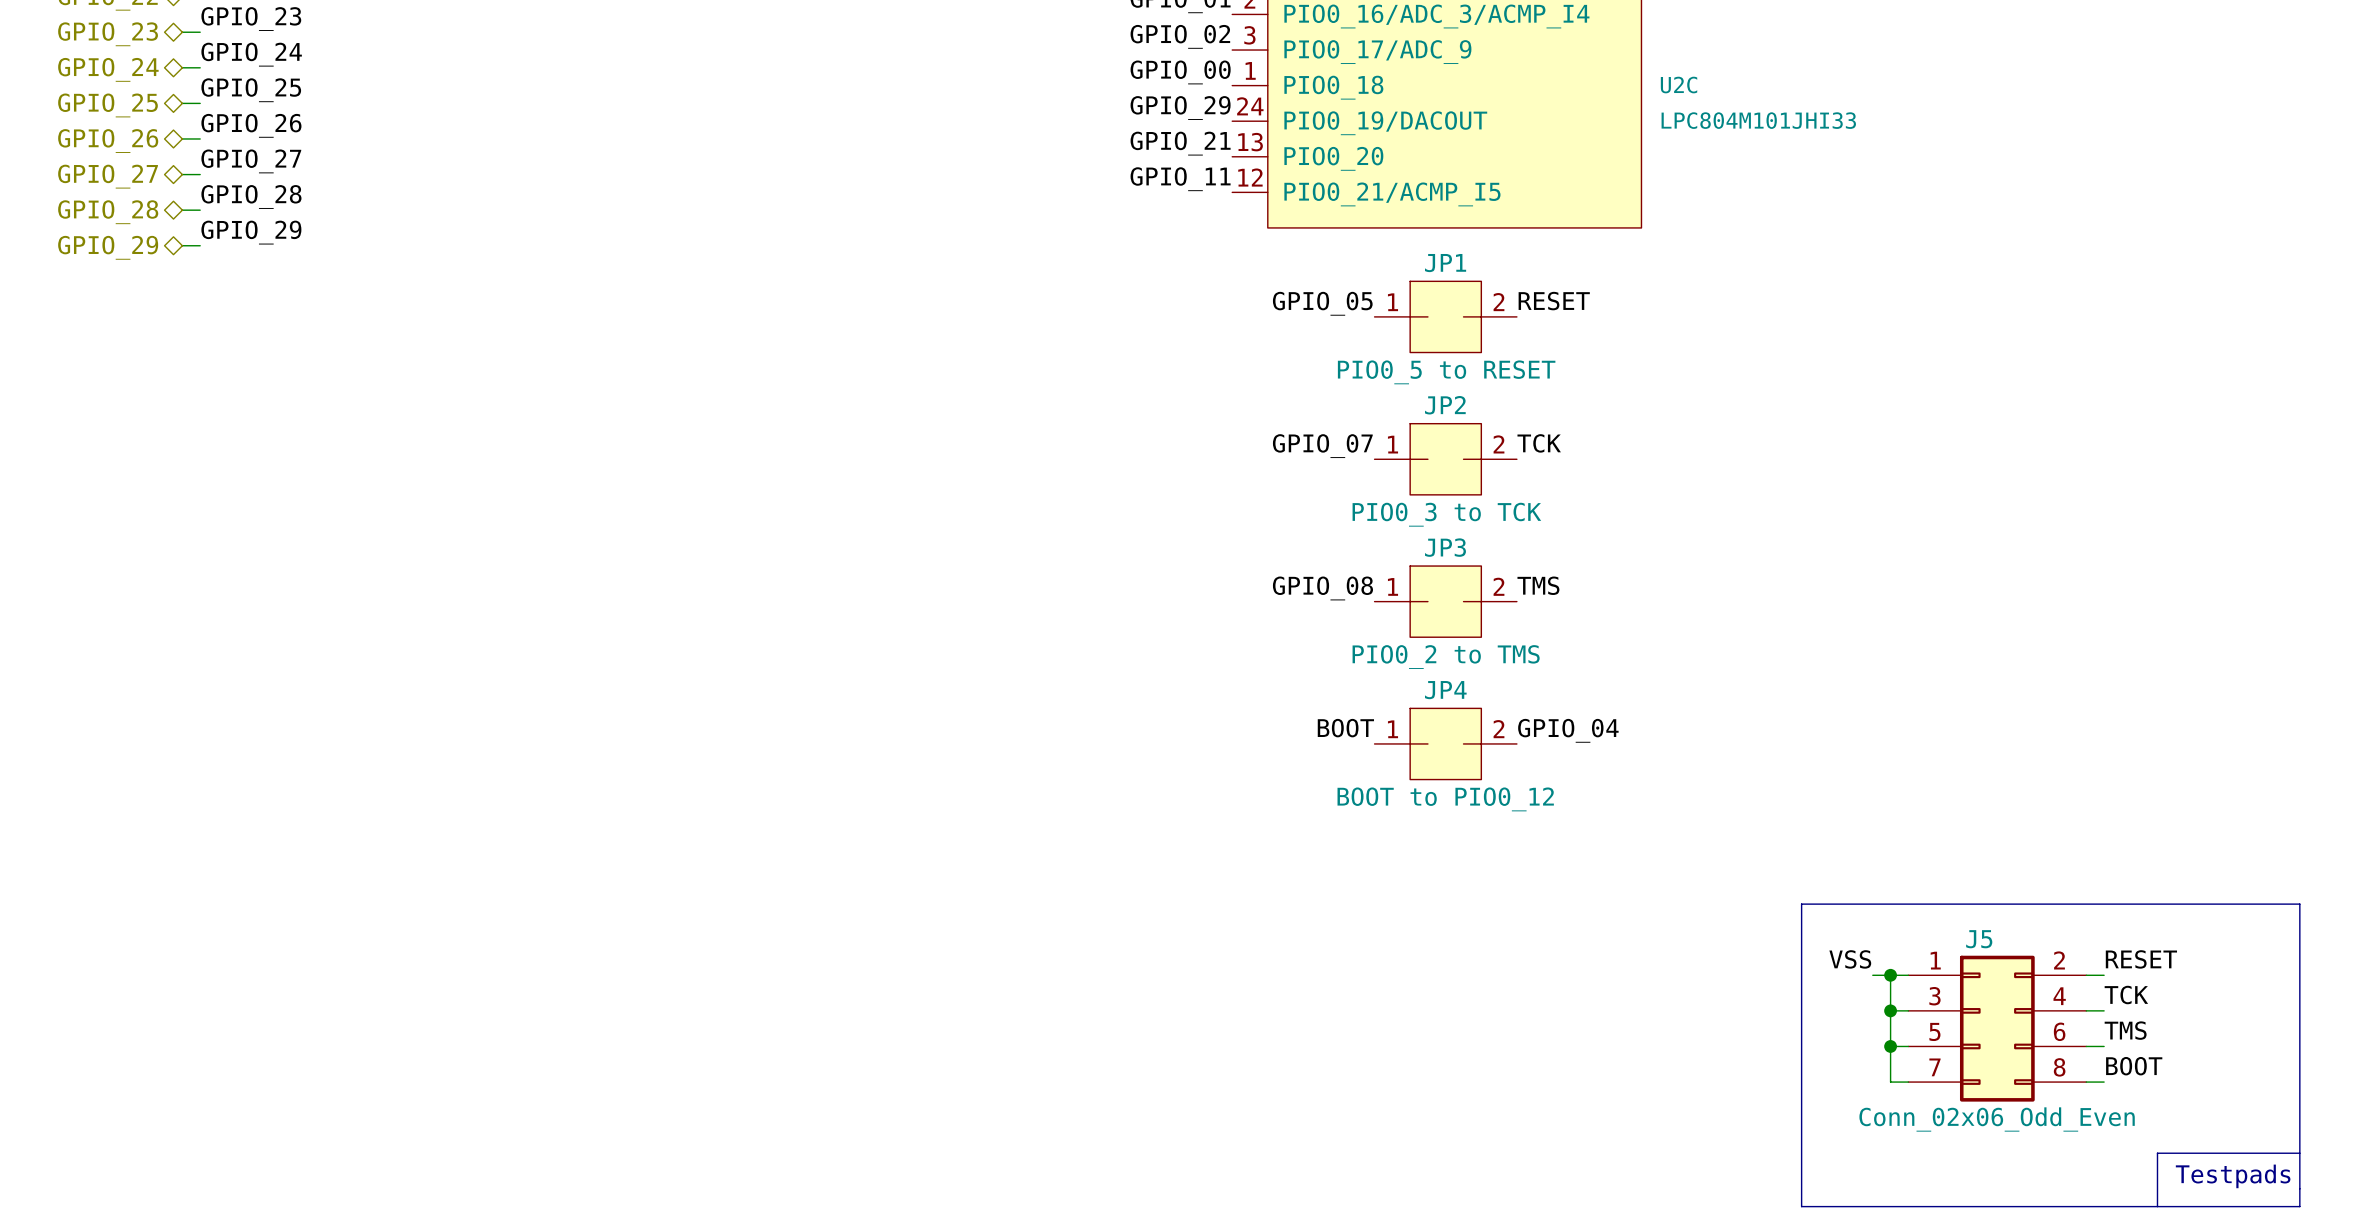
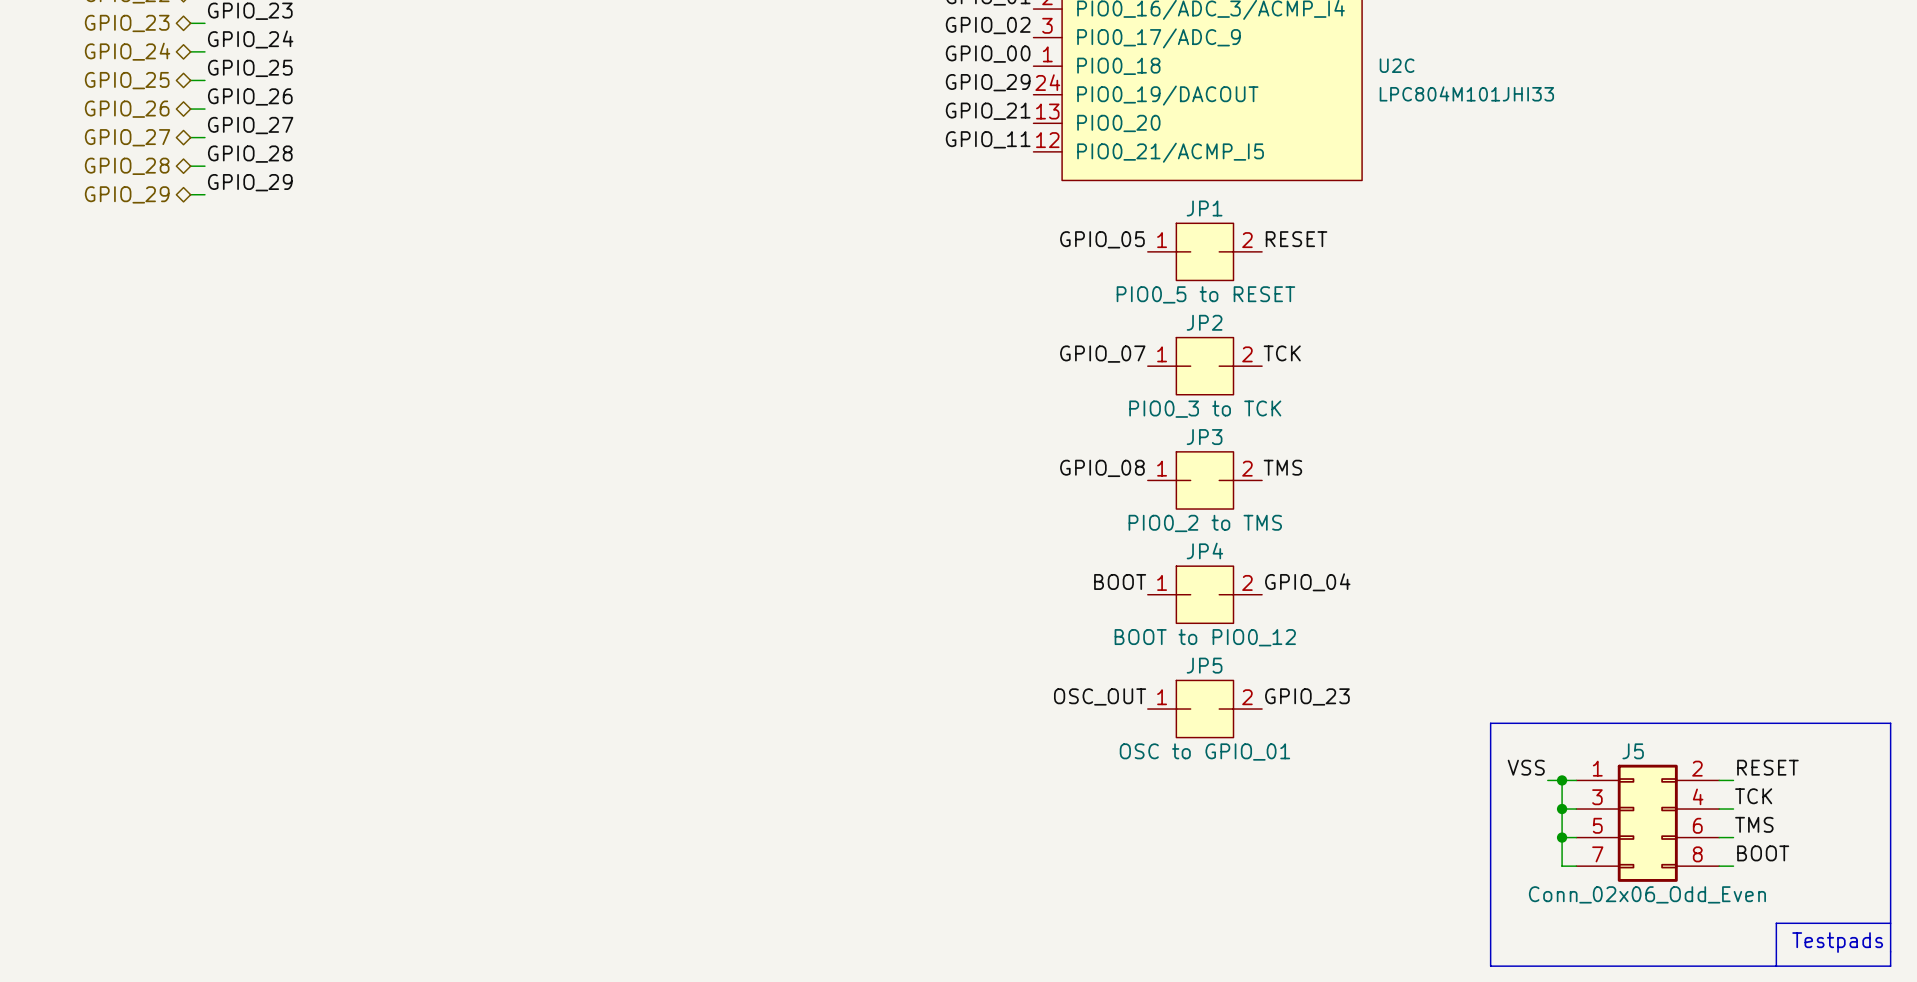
label: none -> OSC_OUT (1100, 696)
label: none -> GPIO_23 (1307, 696)
JP5: none -> OSC to GPIO_01 (1204, 709)

